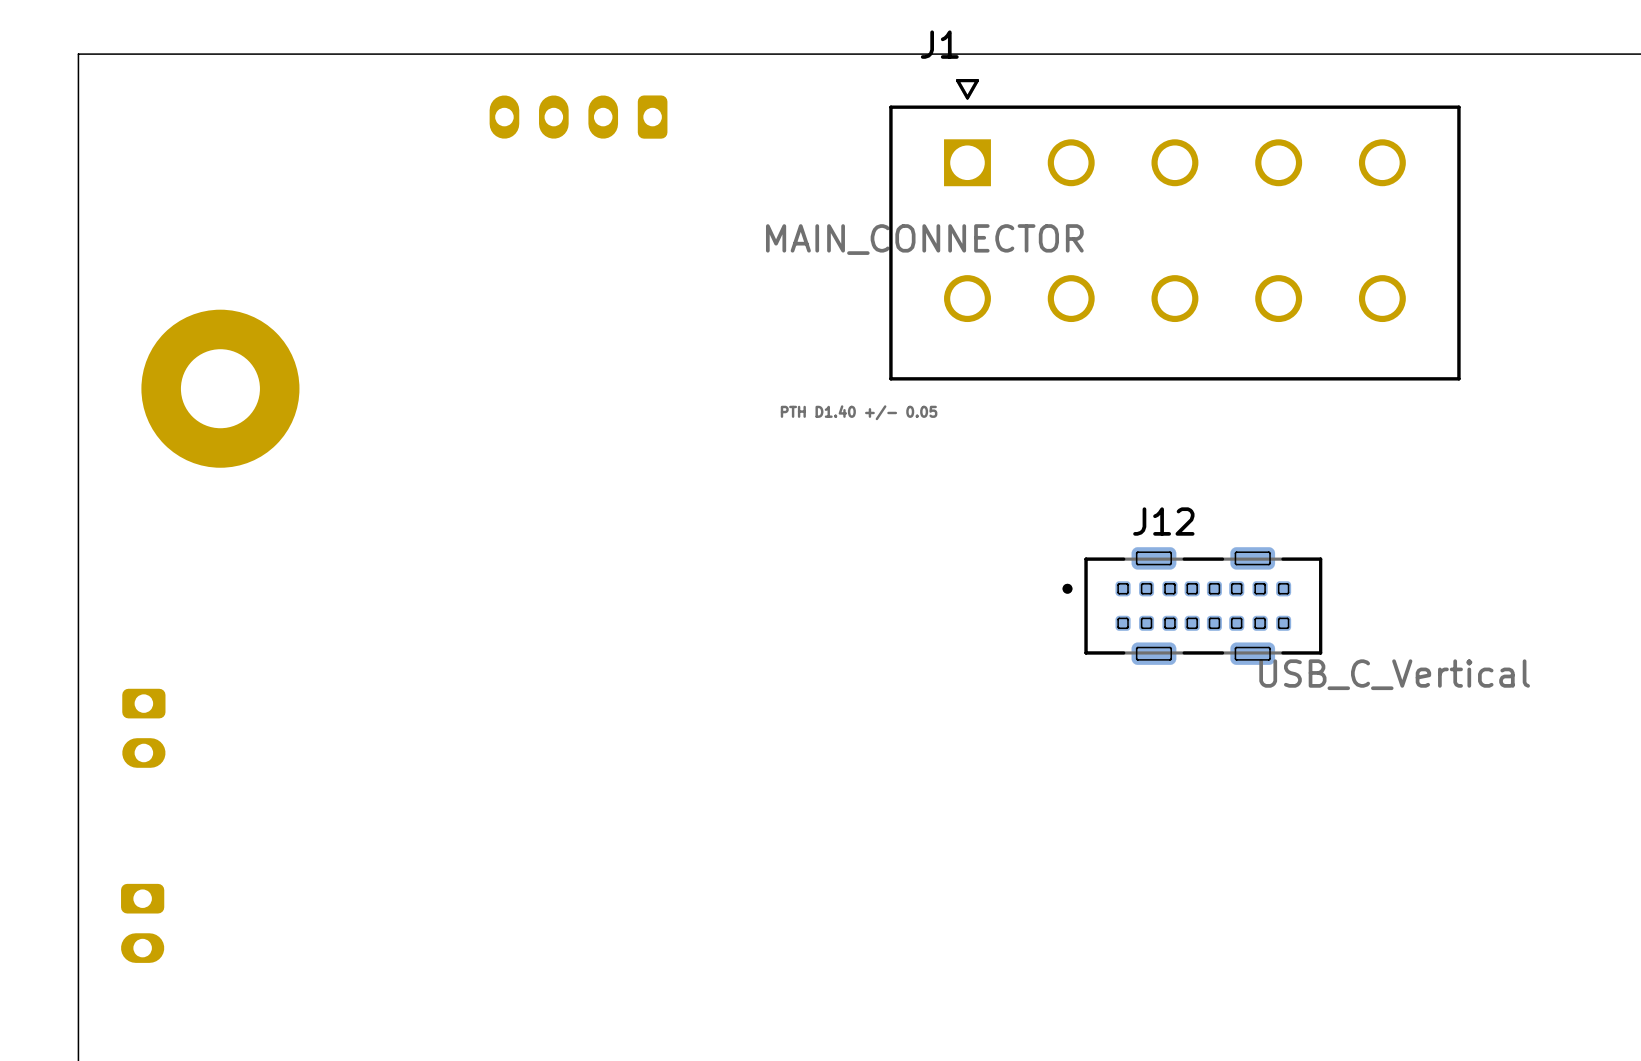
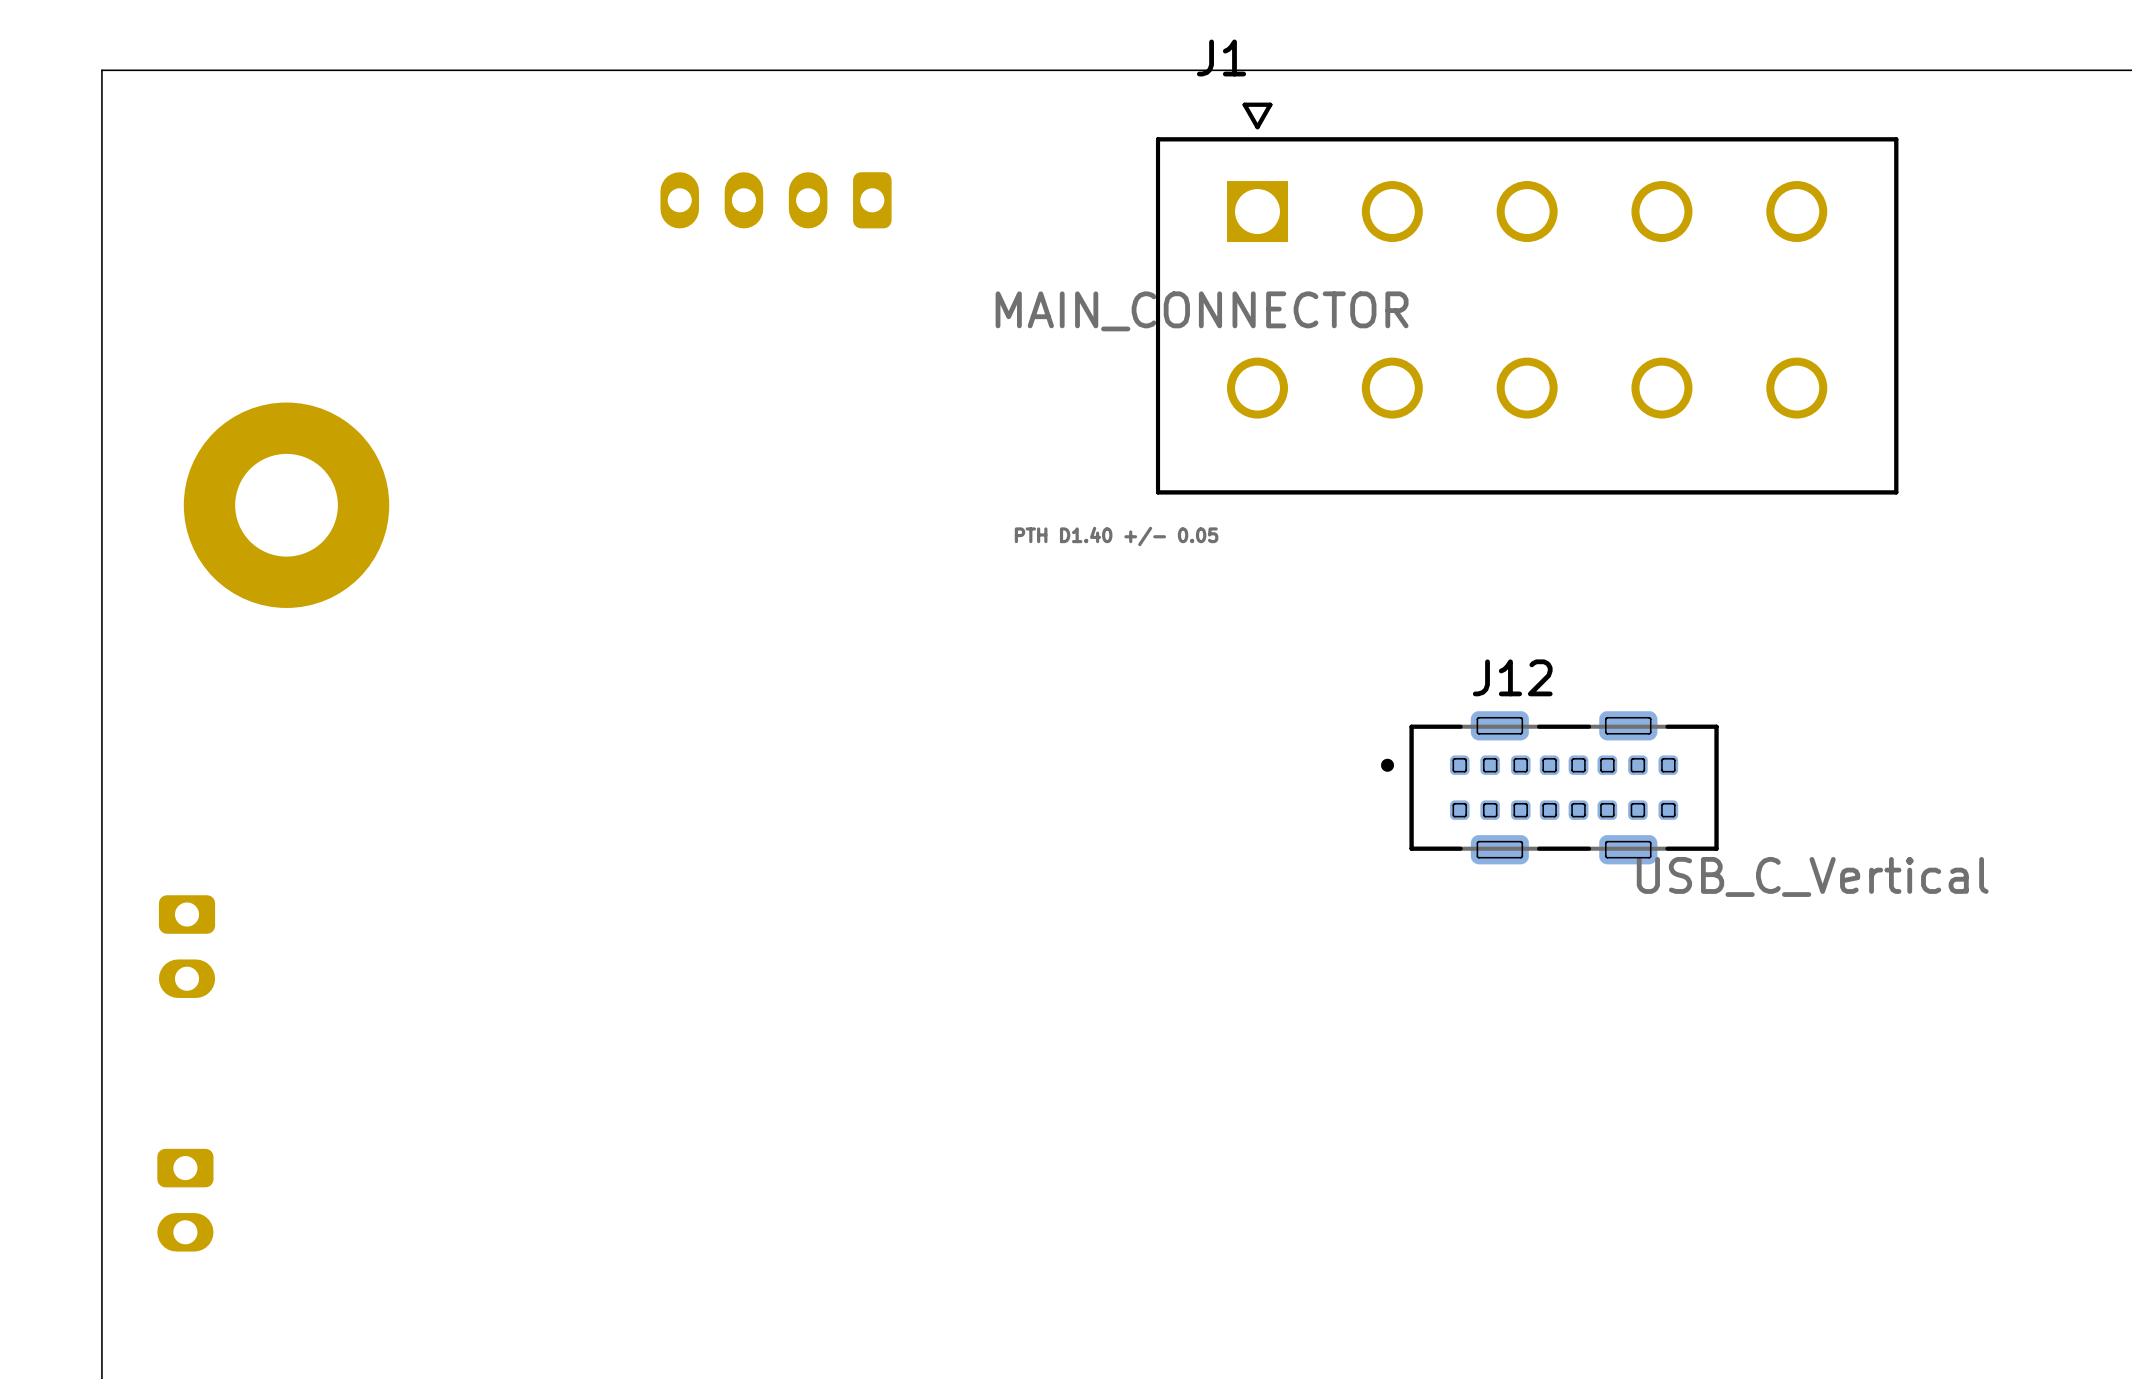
part position: (578, 117) -> (776, 200)

